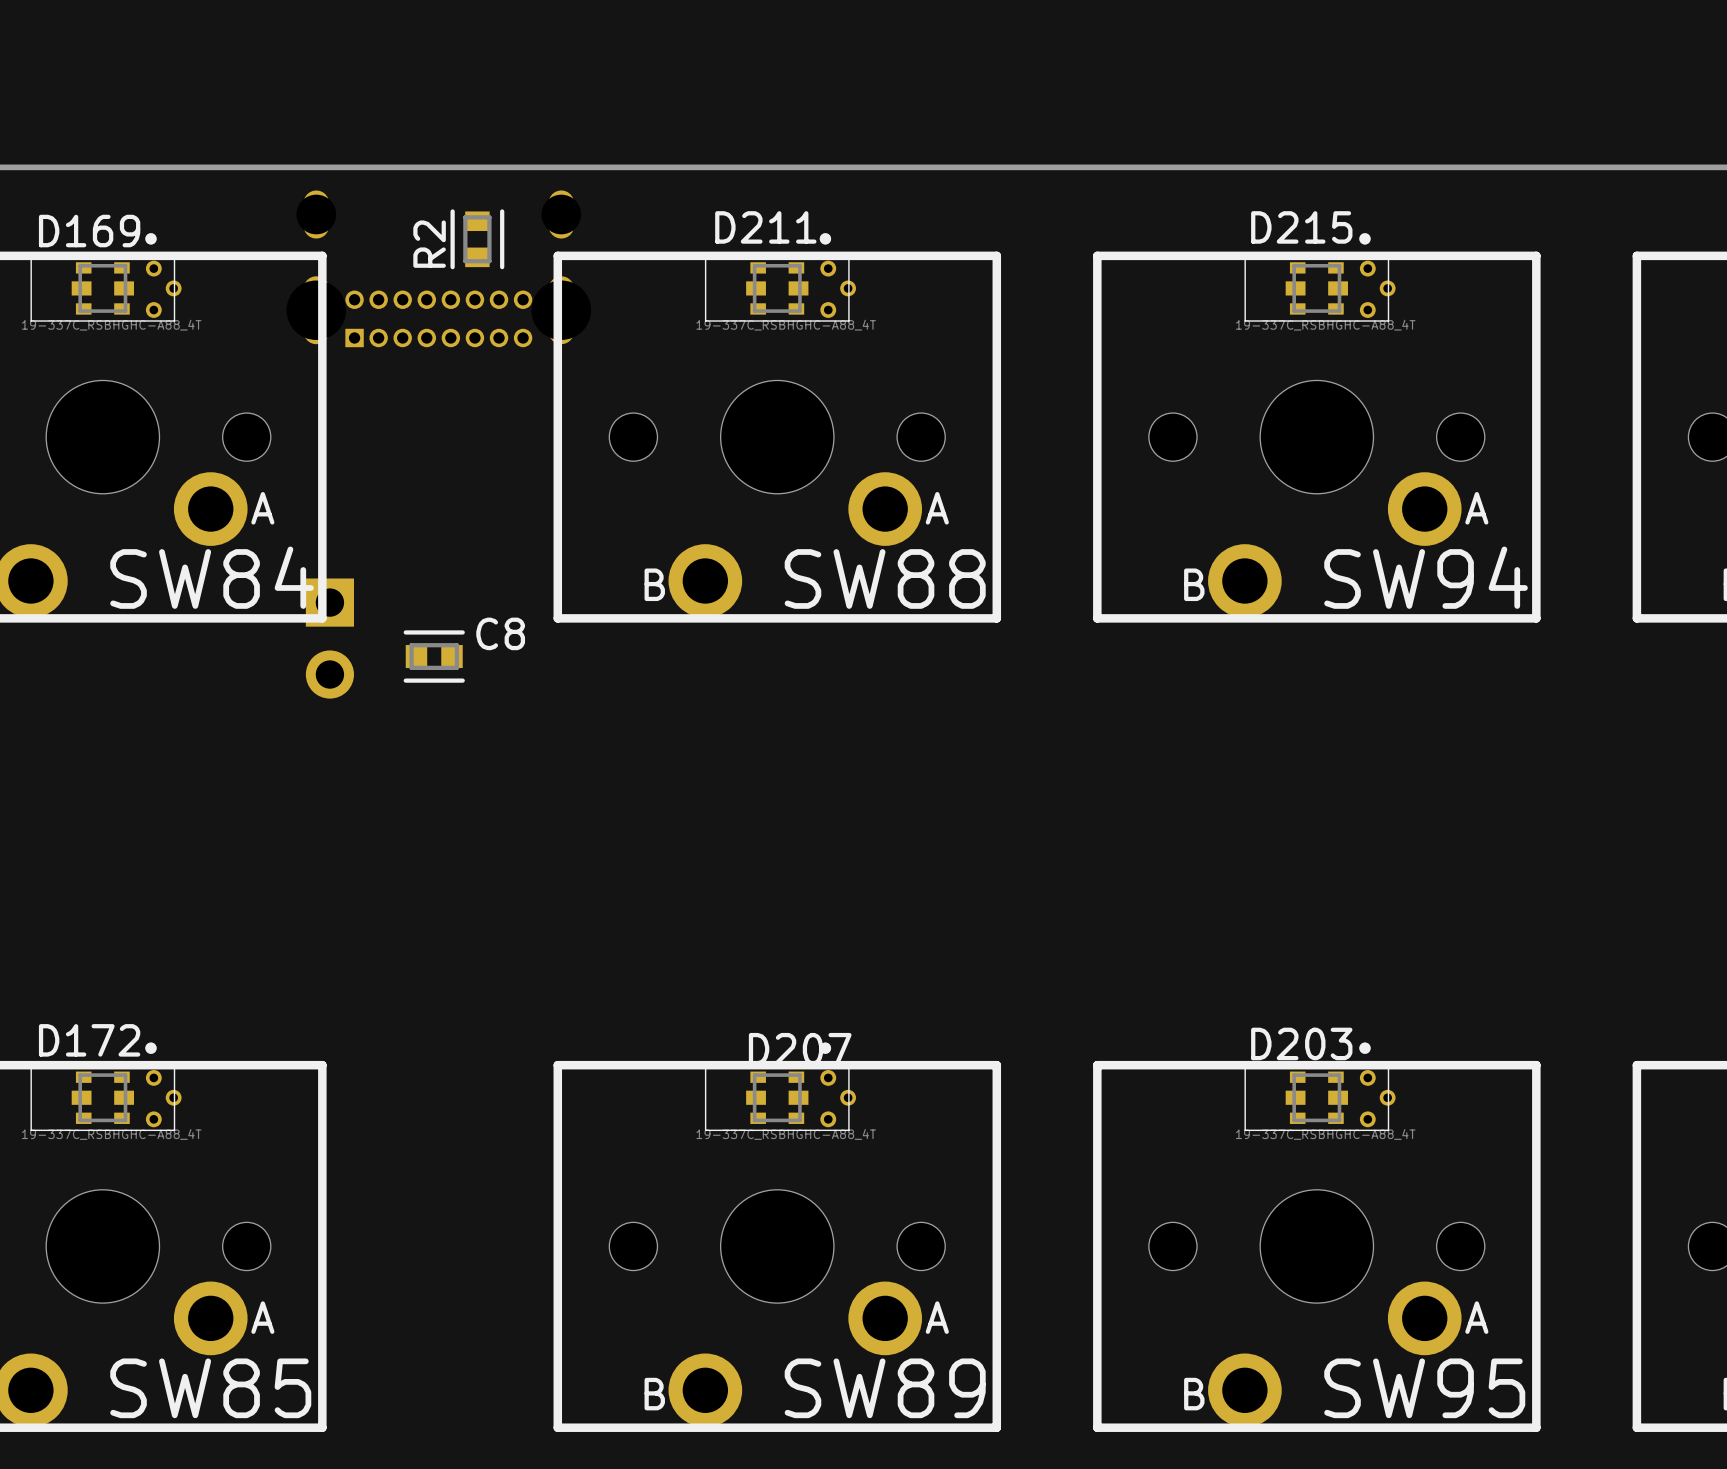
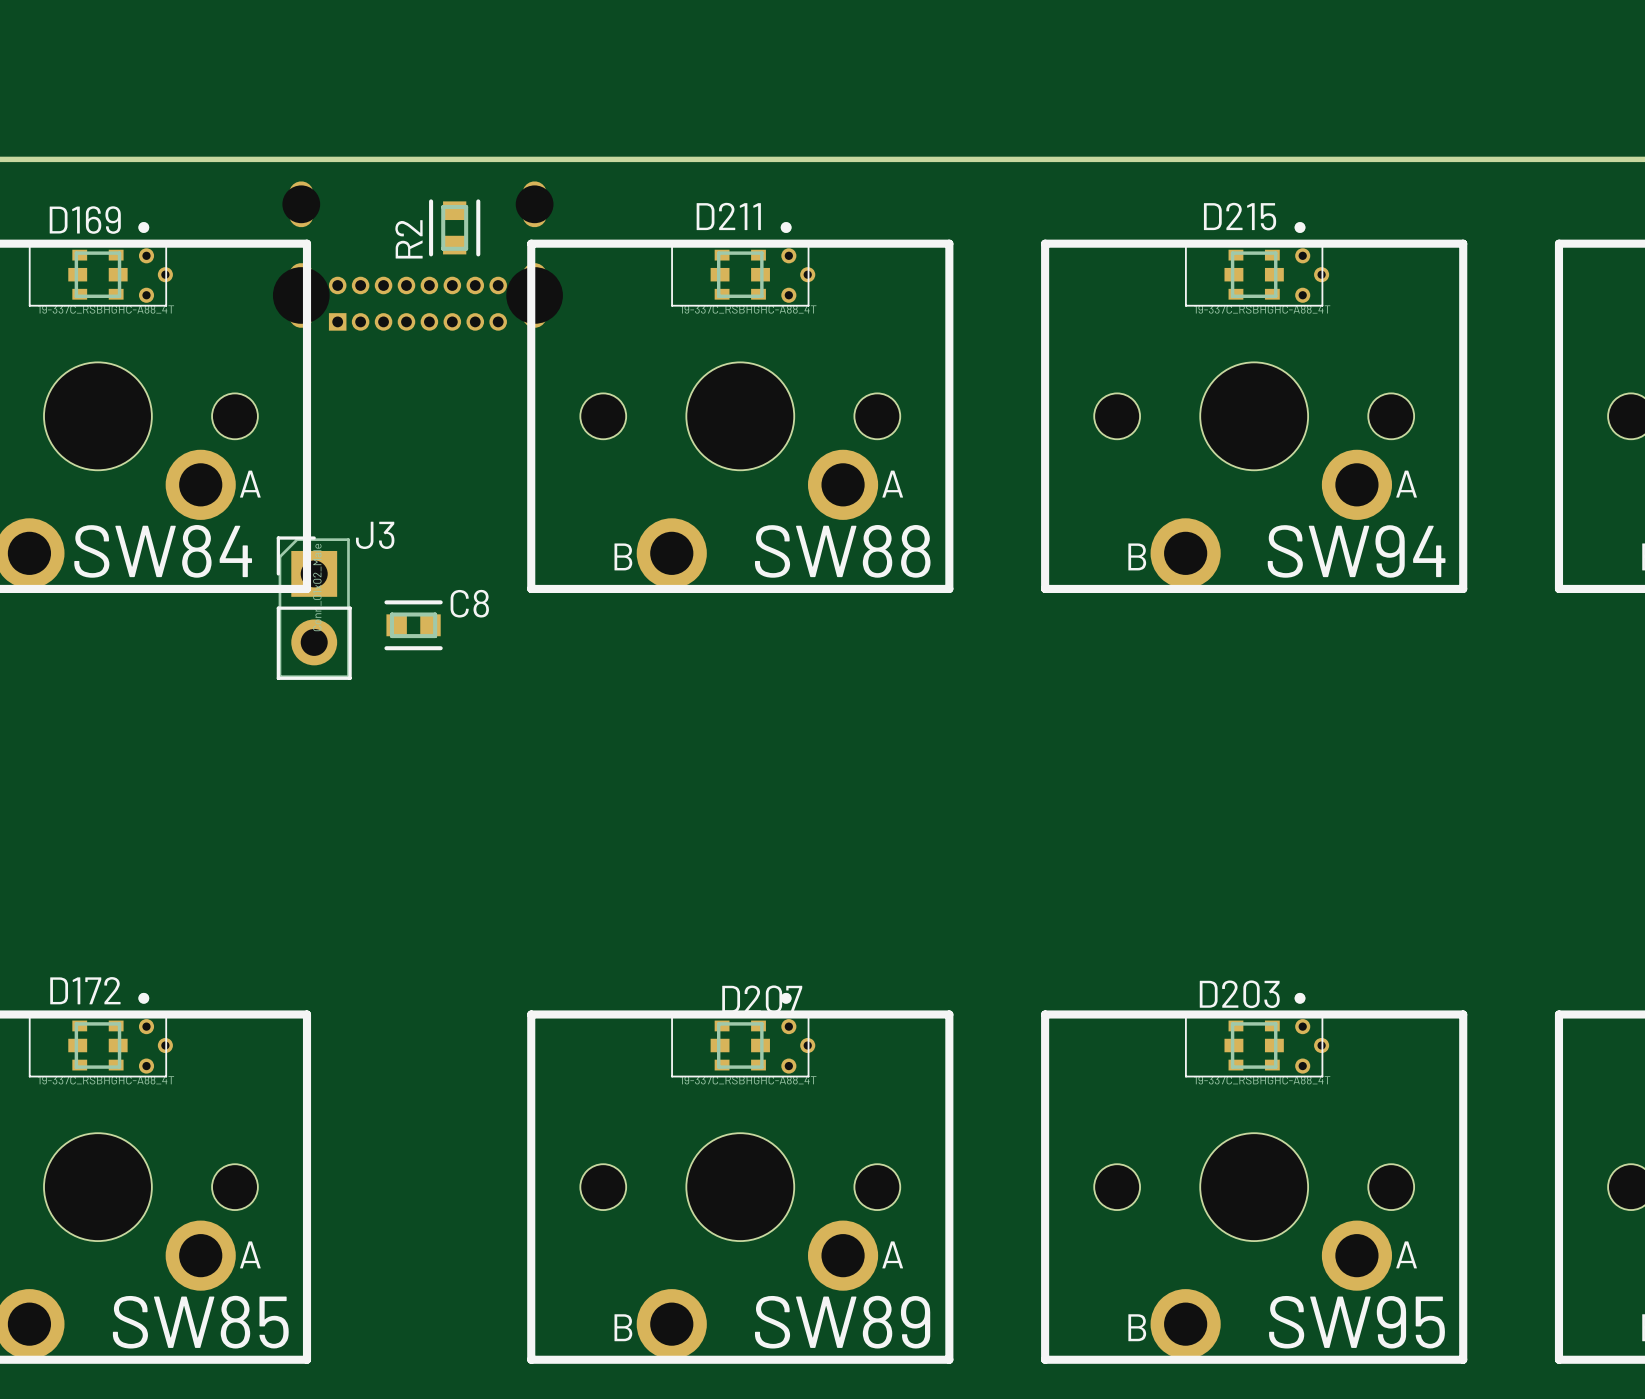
SW84 name position: SW84 (212, 577) -> SW84 (163, 551)
J3 side: bottom (329, 638) -> top (314, 608)

